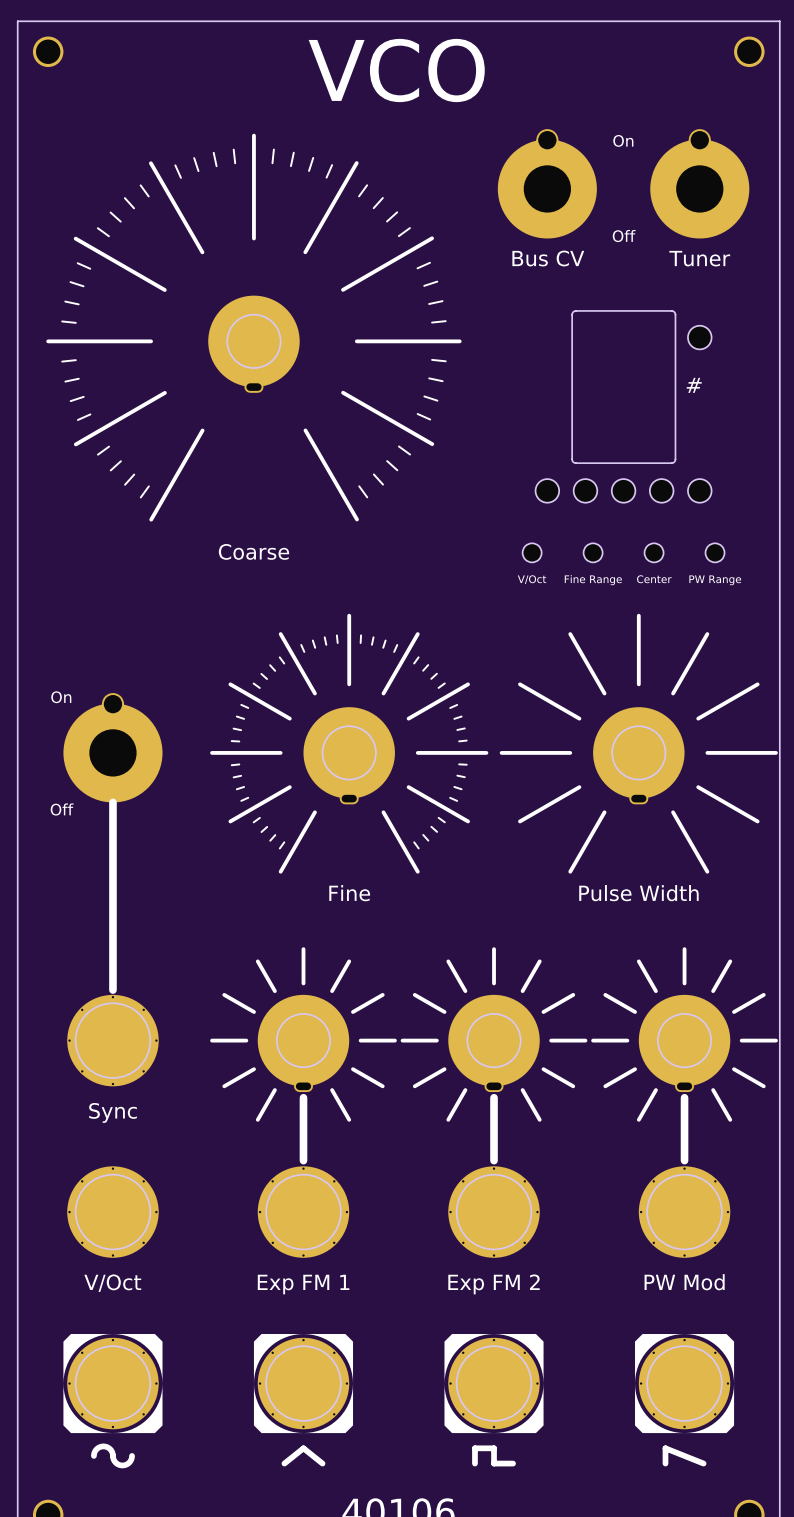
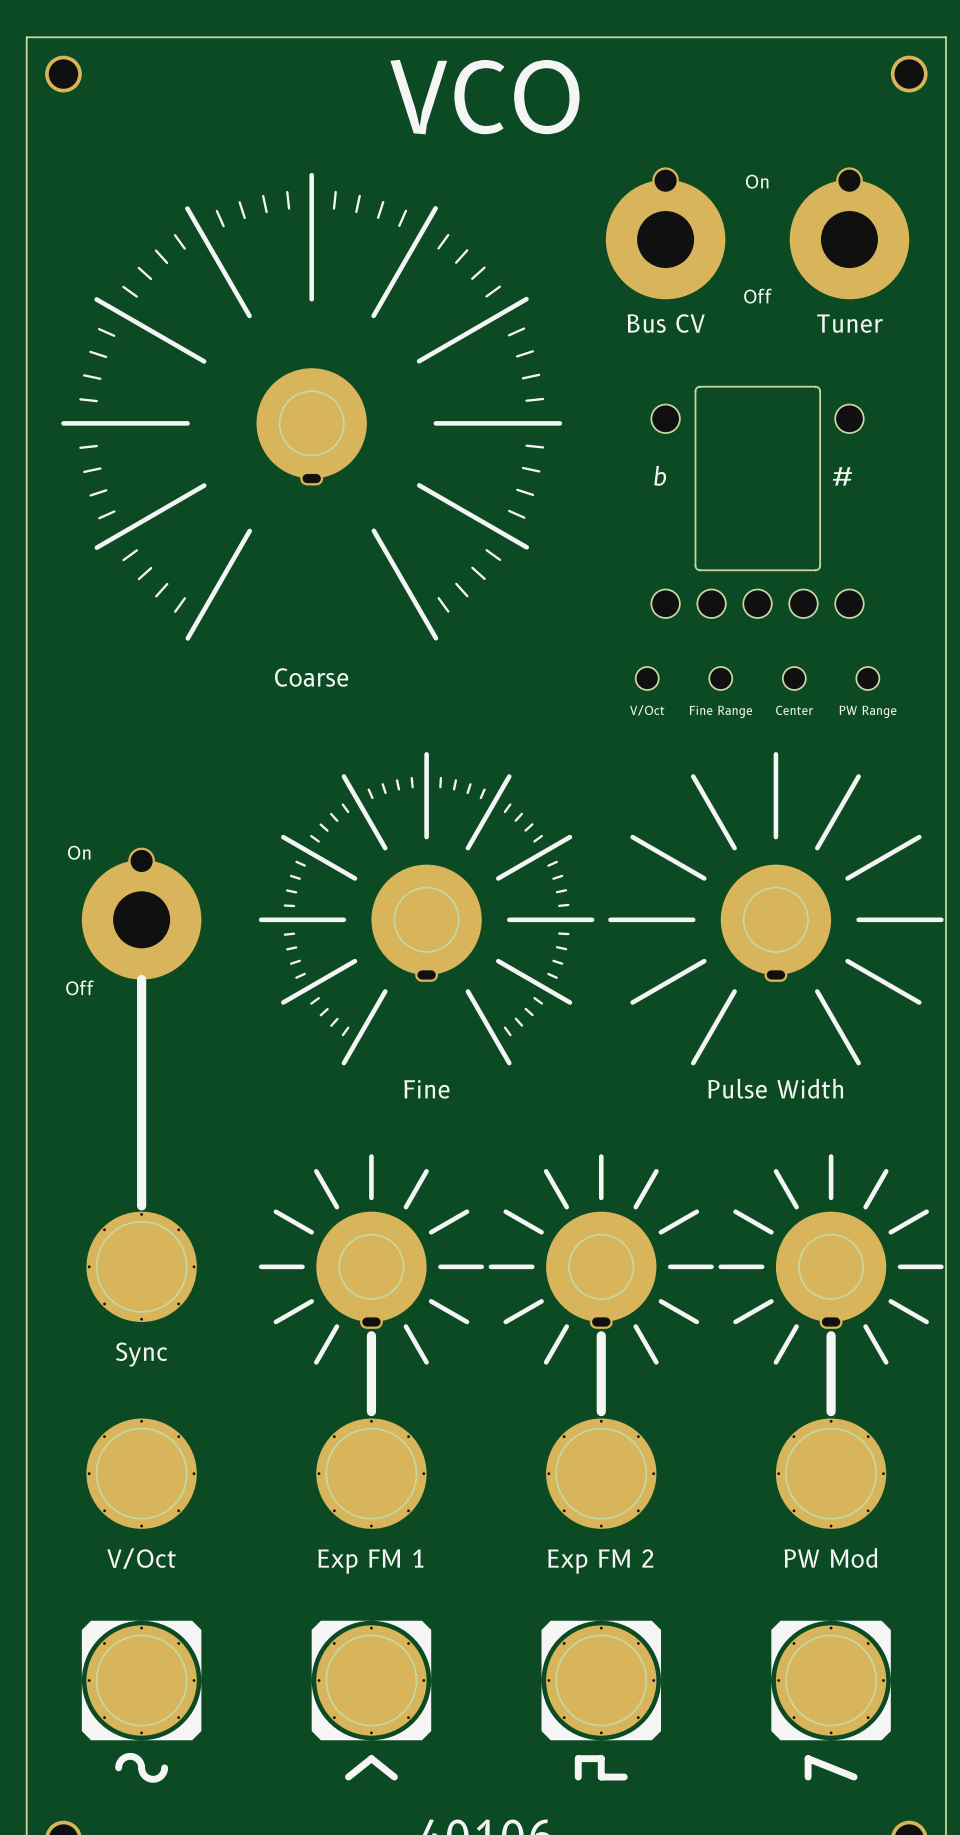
part: none -> (665, 418)
text: none -> b (660, 475)

